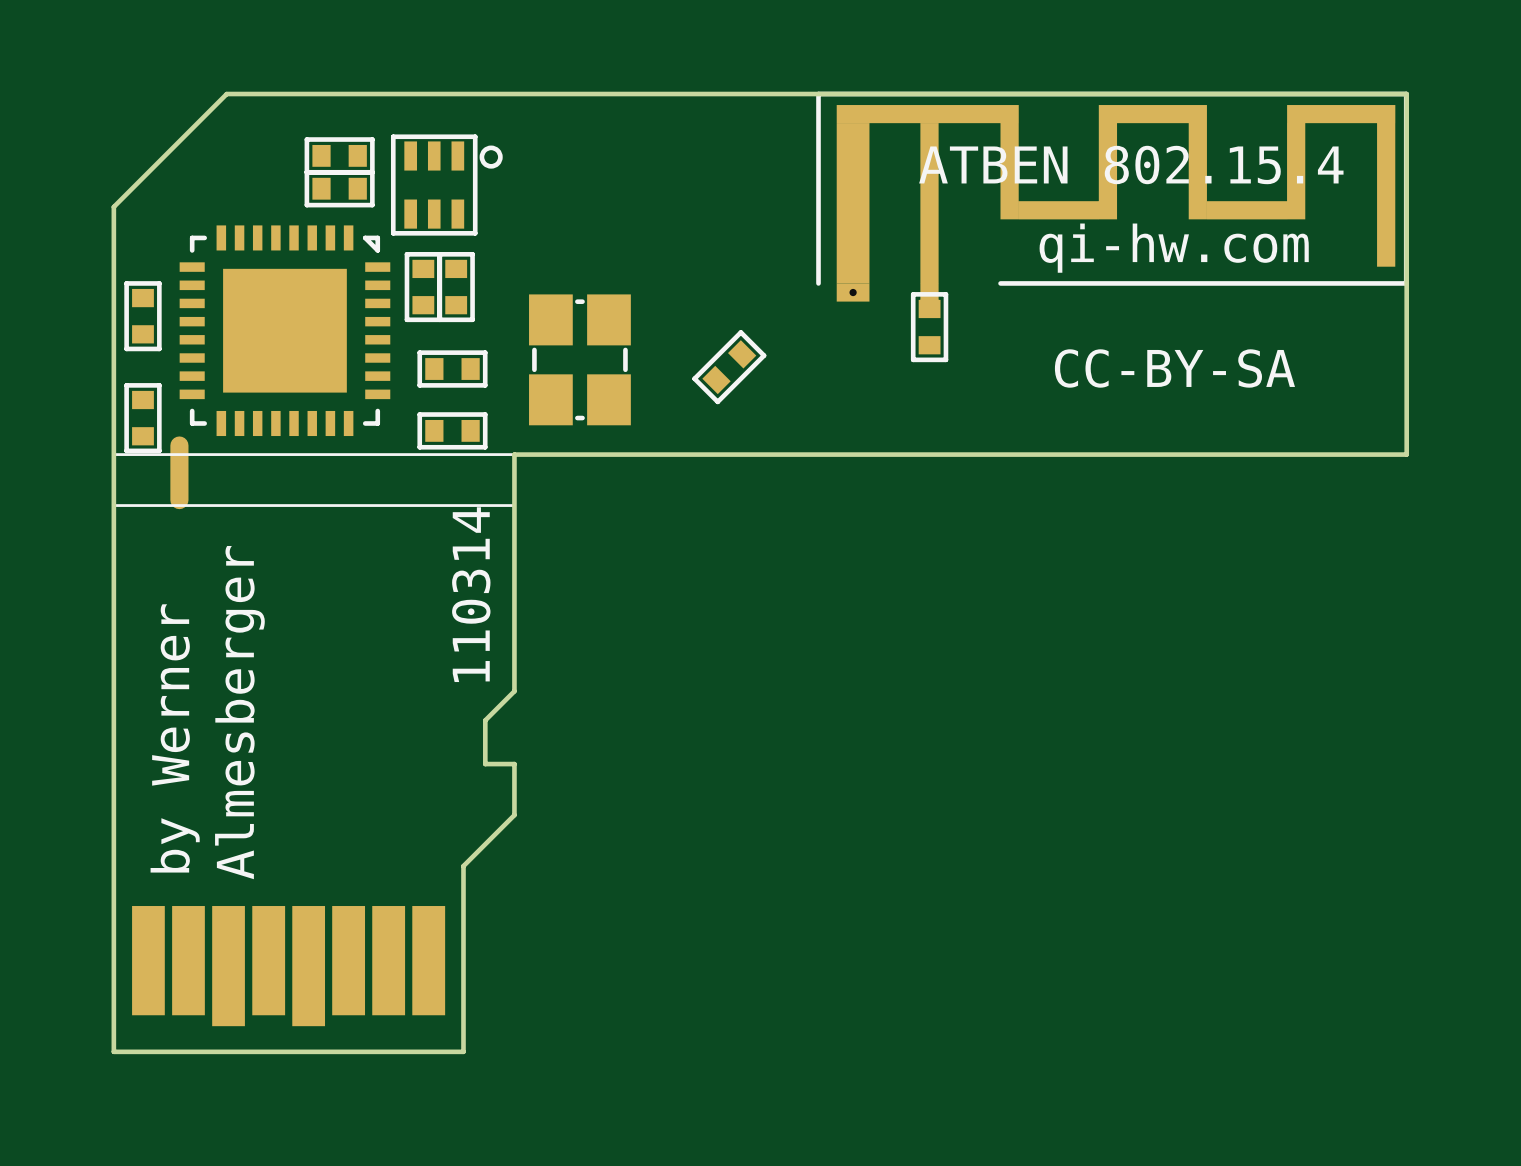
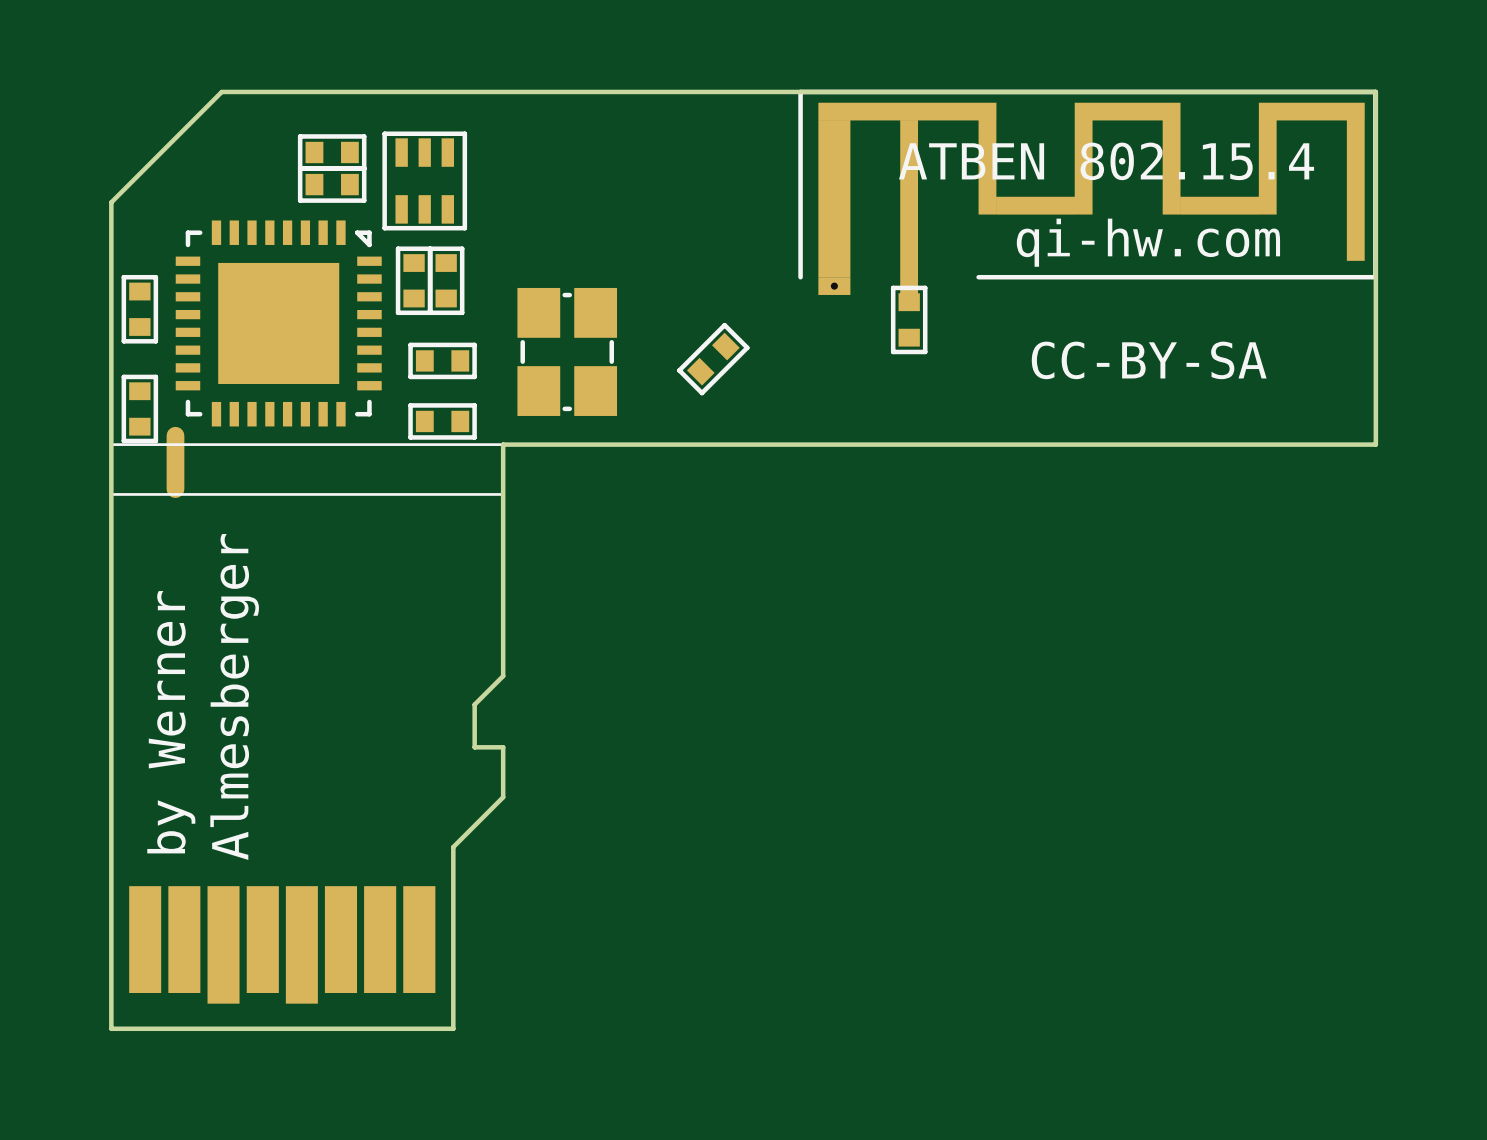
drawing: [479, 145, 503, 169] -> none
text: 110314 (471, 594) -> none

